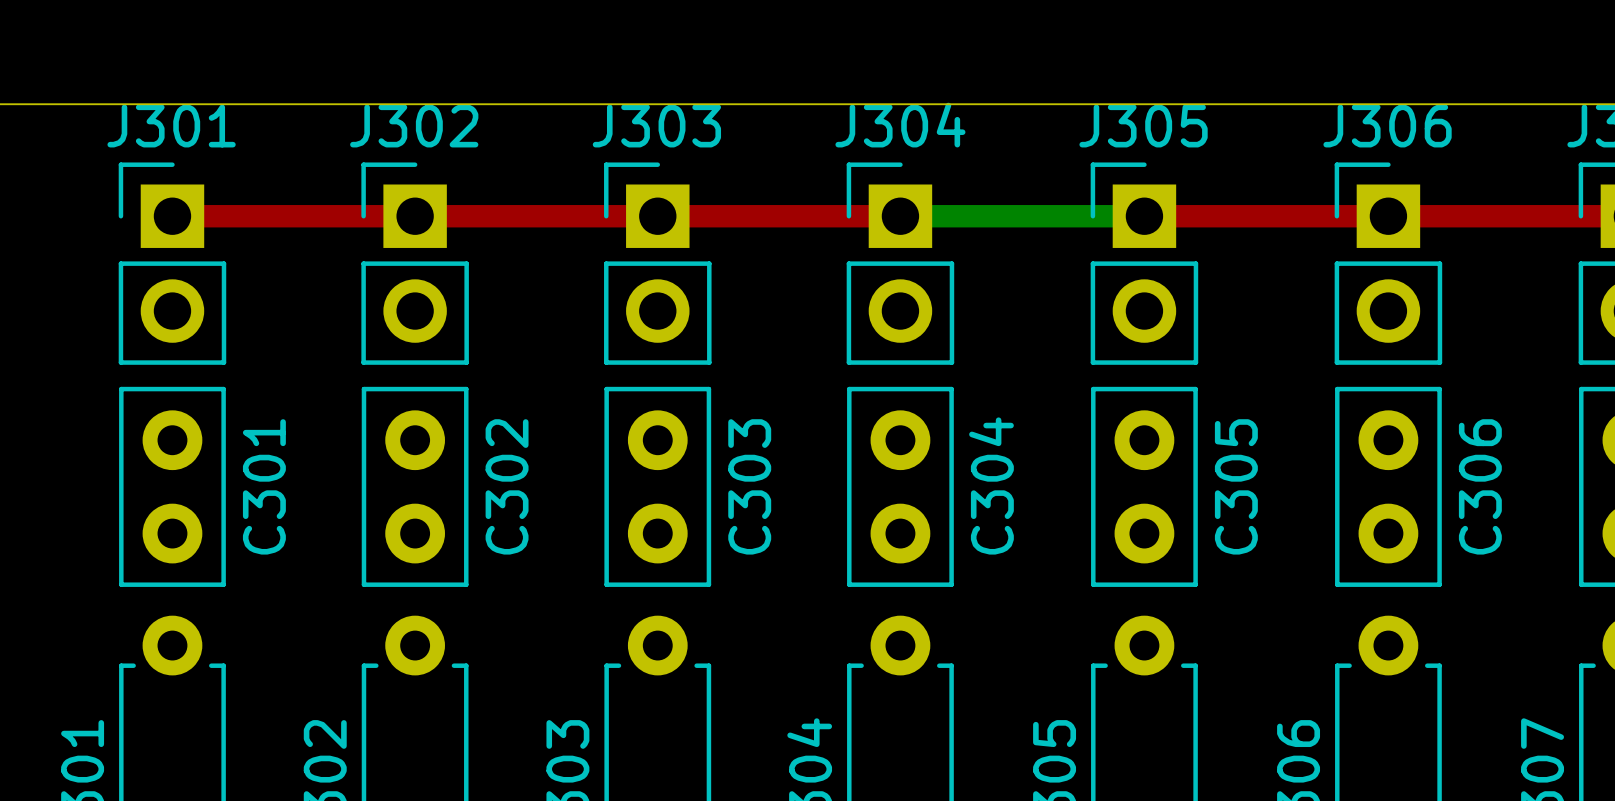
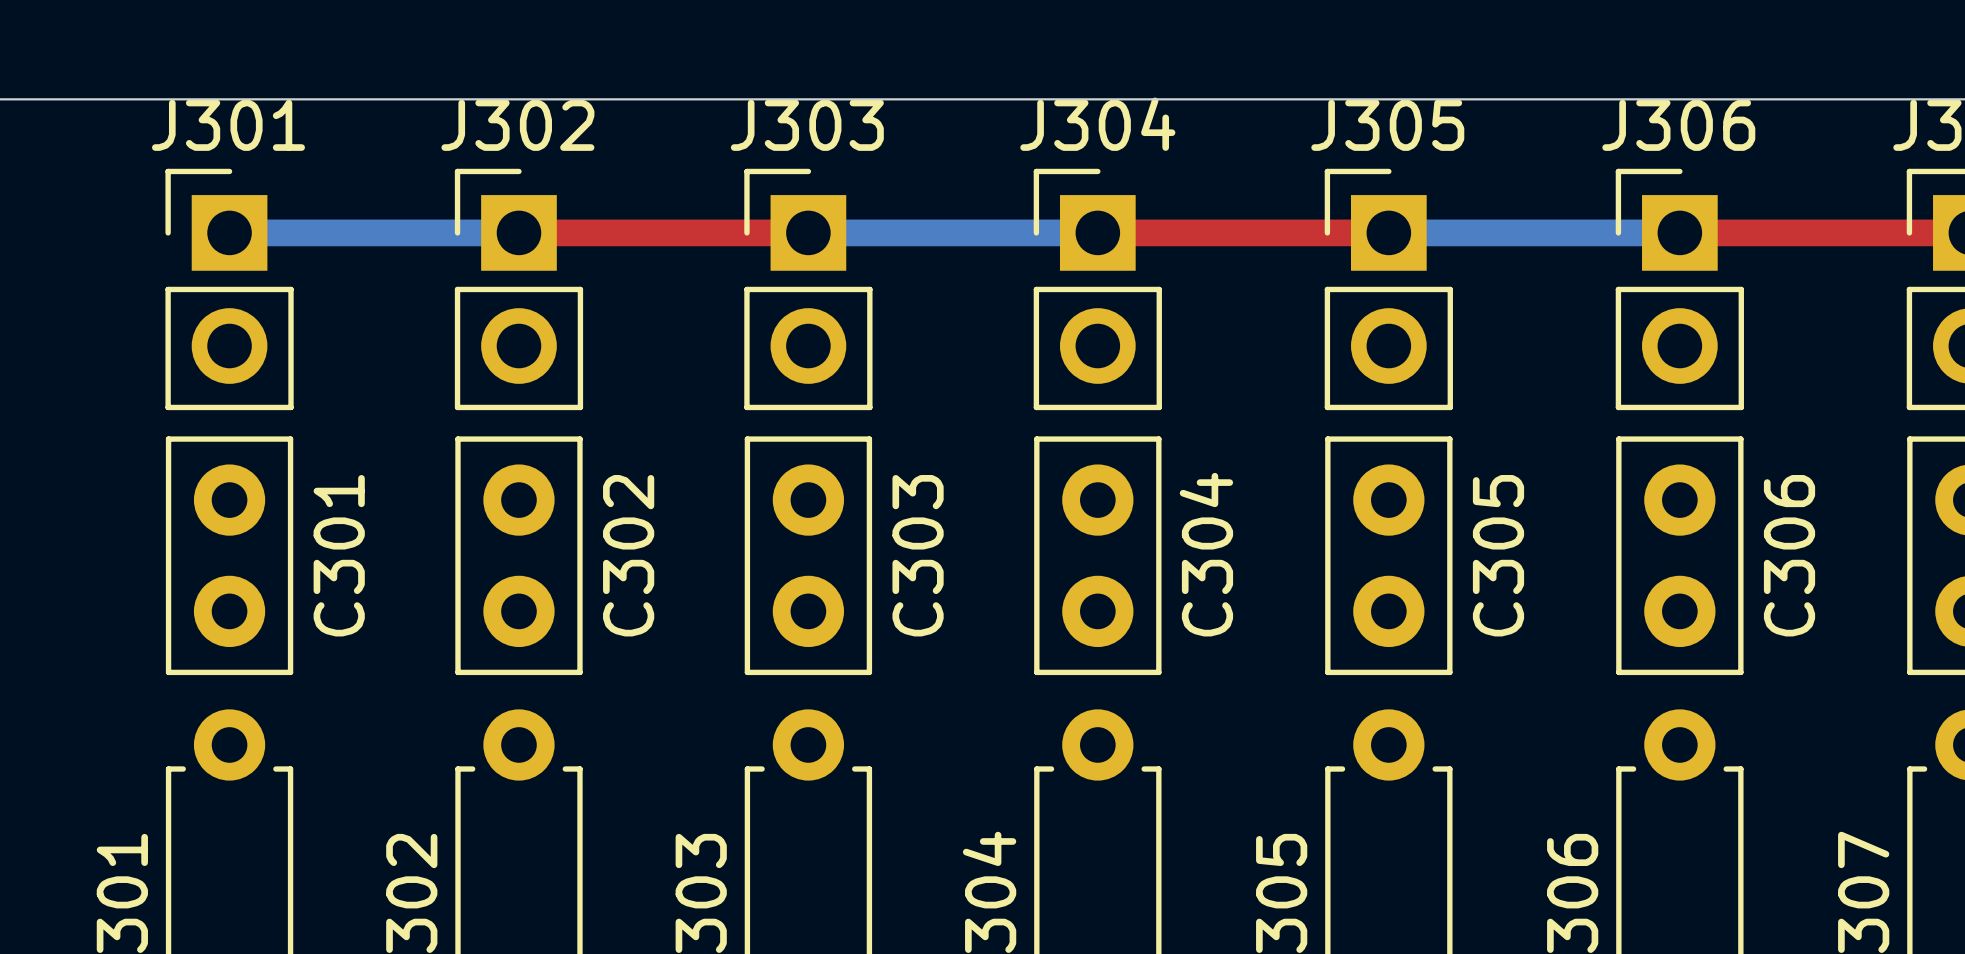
top track: (172, 216) (415, 216) -> none
bottom track: none -> (229, 232) (518, 232)
top track: (657, 216) (900, 216) -> (1388, 232) (1097, 232)
bottom track: (900, 216) (1144, 216) -> (1097, 232) (808, 232)
top track: (1144, 216) (1388, 216) -> none
bottom track: none -> (1388, 232) (1679, 232)

